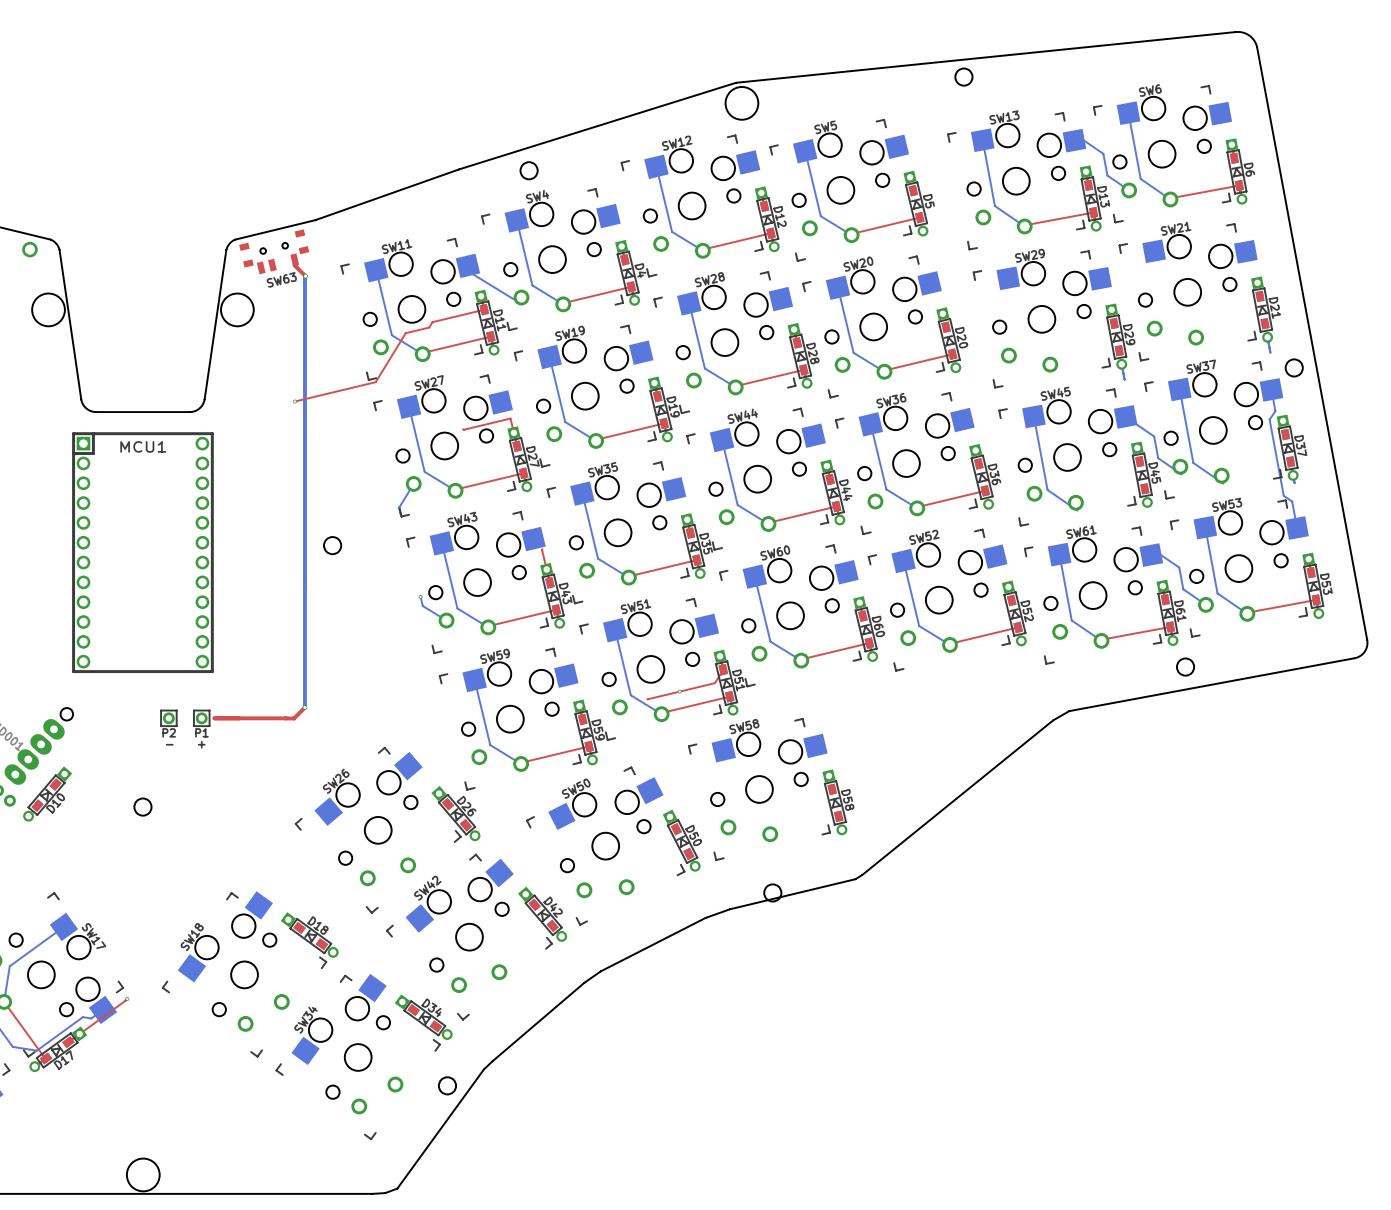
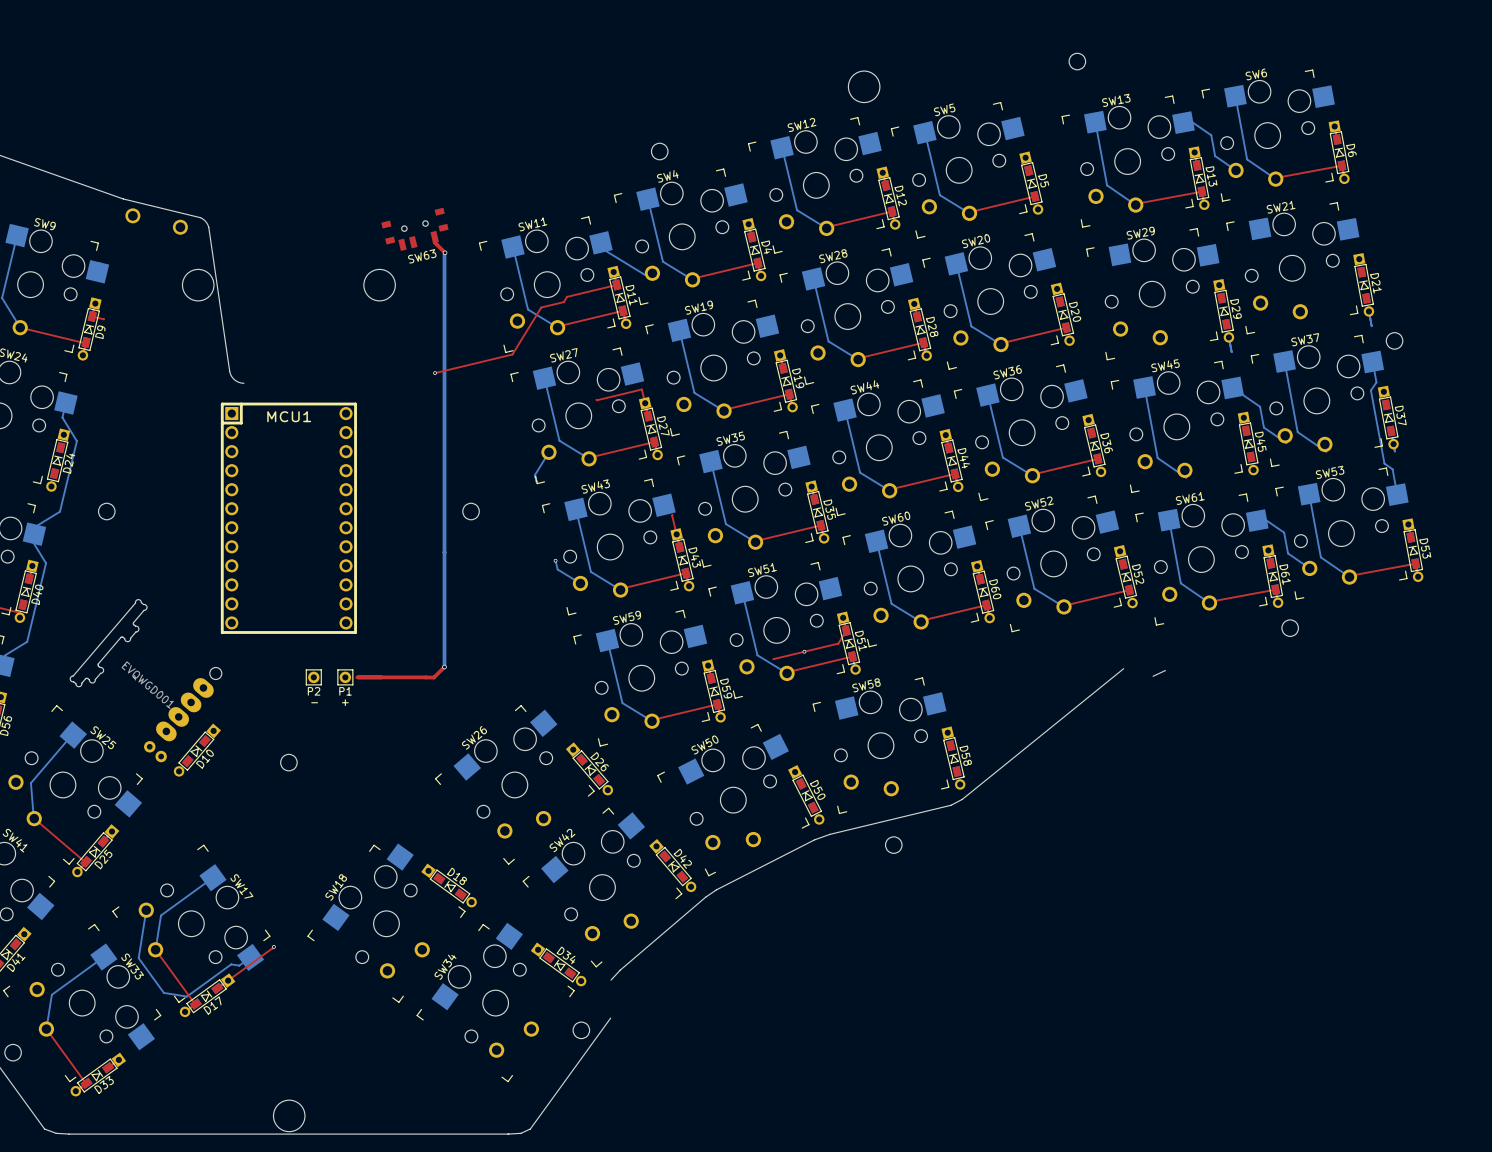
board edge: (96, 412) (189, 412) (196, 410) (201, 406) (204, 399) (226, 249) (229, 243) (235, 239) (315, 220) (459, 169) (736, 82) (1235, 32) (1249, 35) (1256, 44) (1367, 640) (1364, 651) (1354, 658) (1069, 711) (1053, 720) (855, 879) (729, 909) (705, 917) (600, 971) (584, 982) (483, 1069) (397, 1188) (384, 1193) -> (610, 1018) (530, 1129) (520, 1133)
board edge: none -> (1123, 668) (962, 799) (951, 805) (830, 834) (814, 839) (716, 889) (620, 970) (611, 980)
board edge: none -> (1165, 670) (1153, 676)

